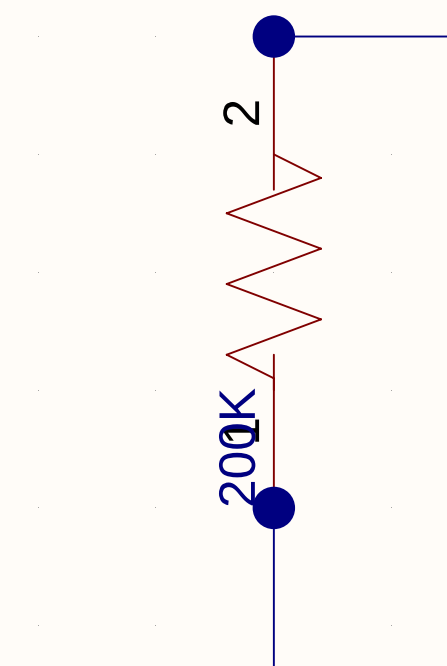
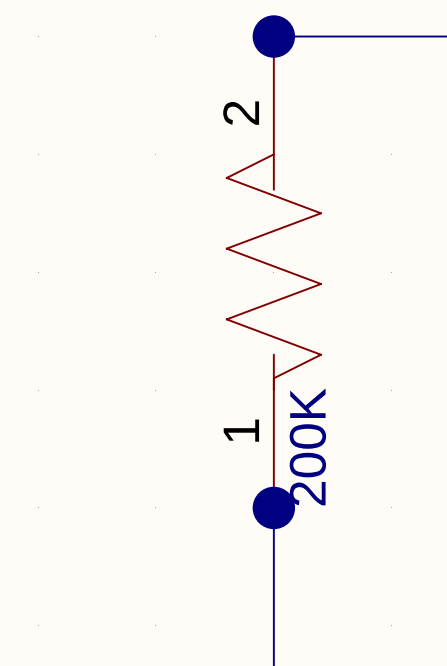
part flip: as is (273, 272) -> left-right (273, 272)

